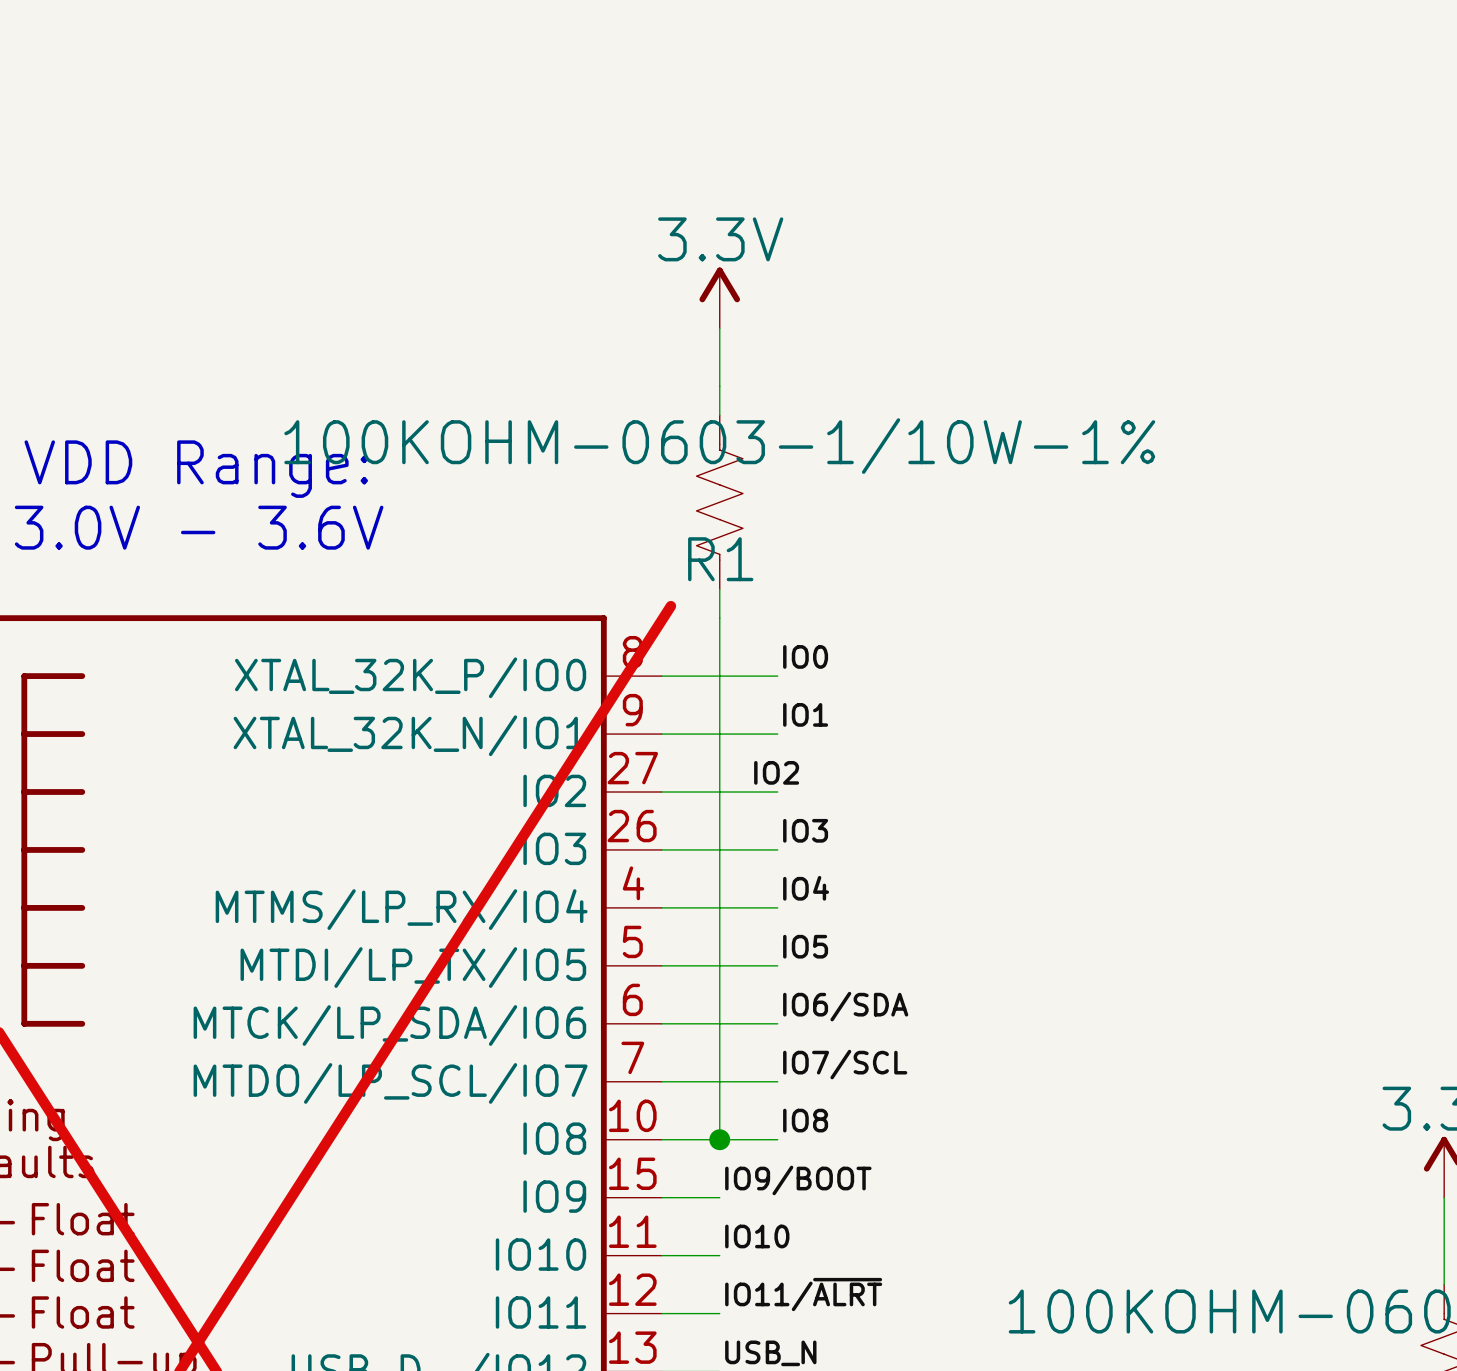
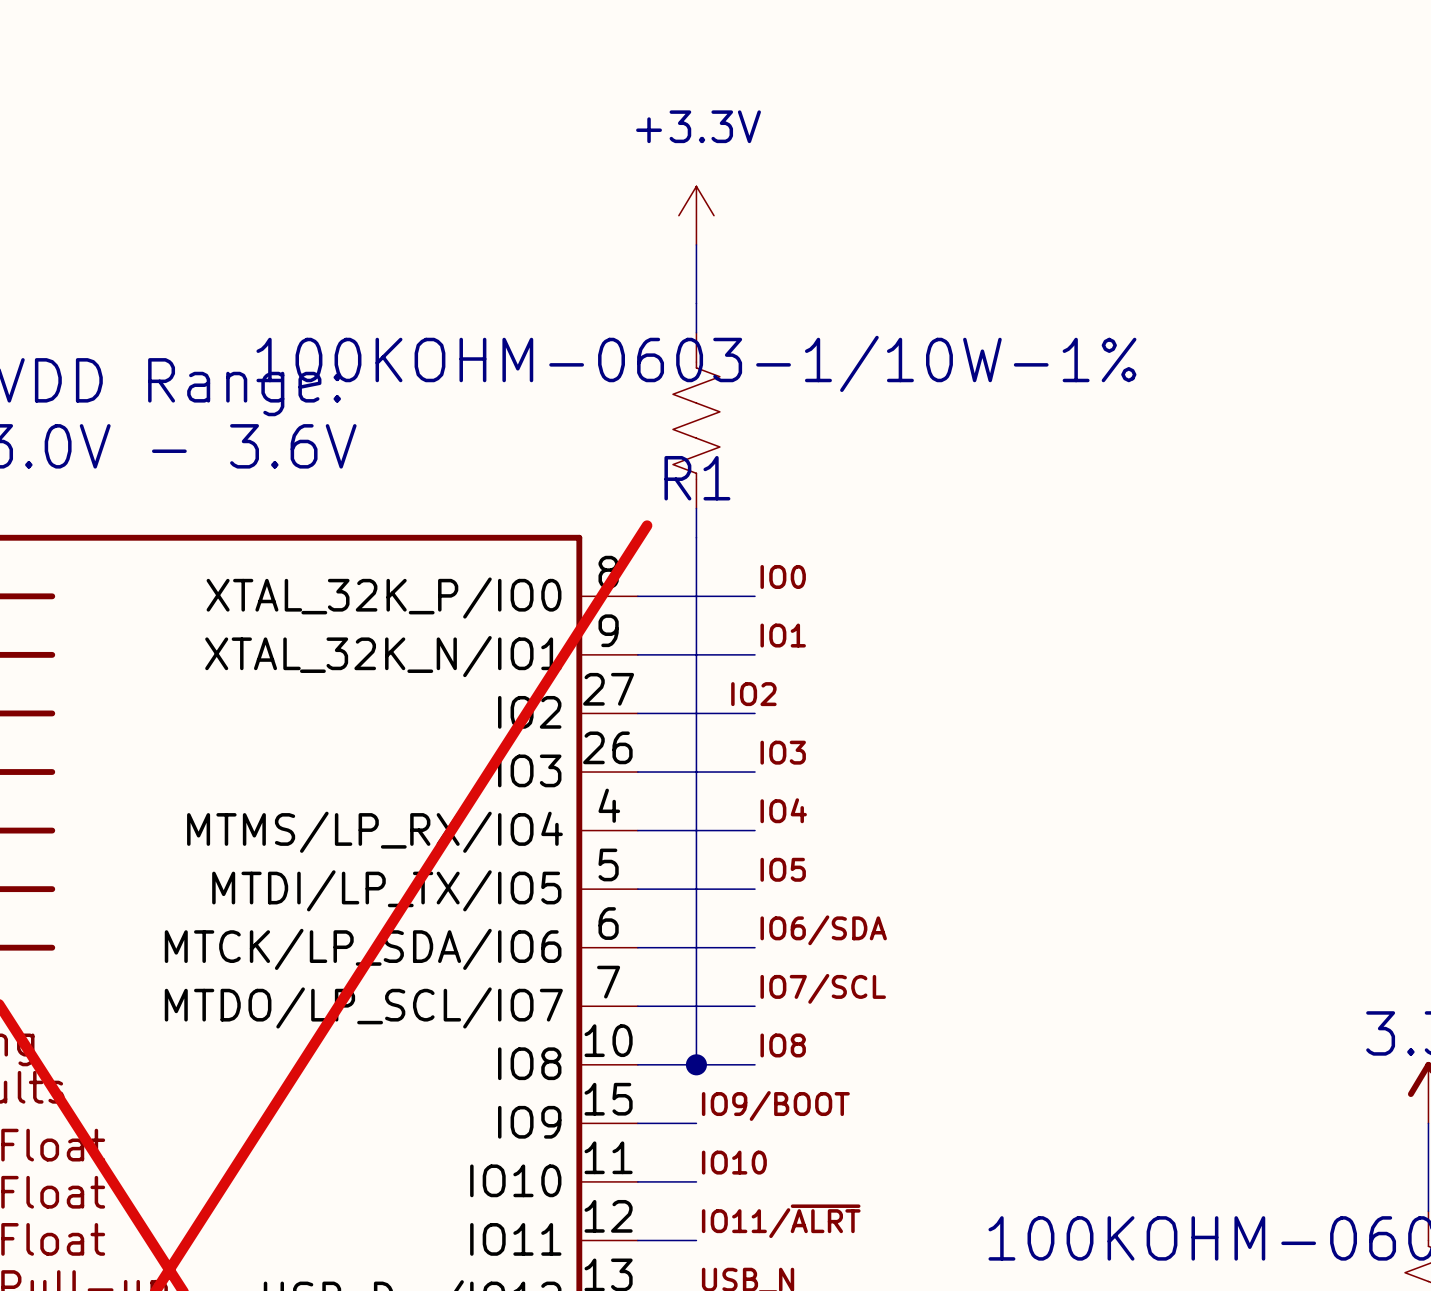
power symbol: 3.3V (719, 297) -> +3.3V (696, 215)

